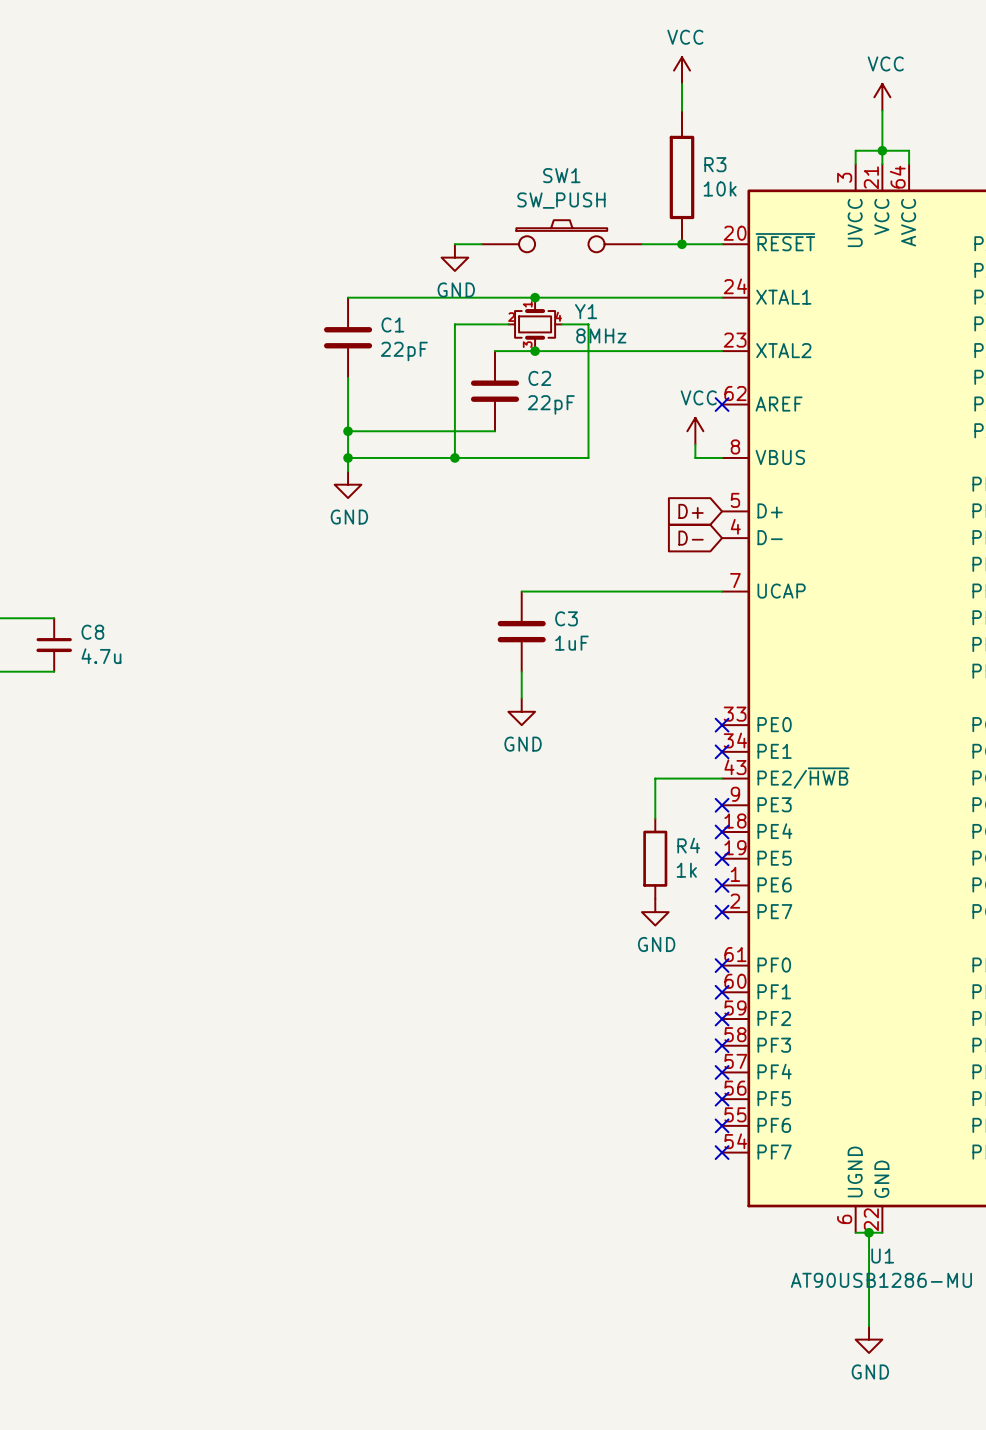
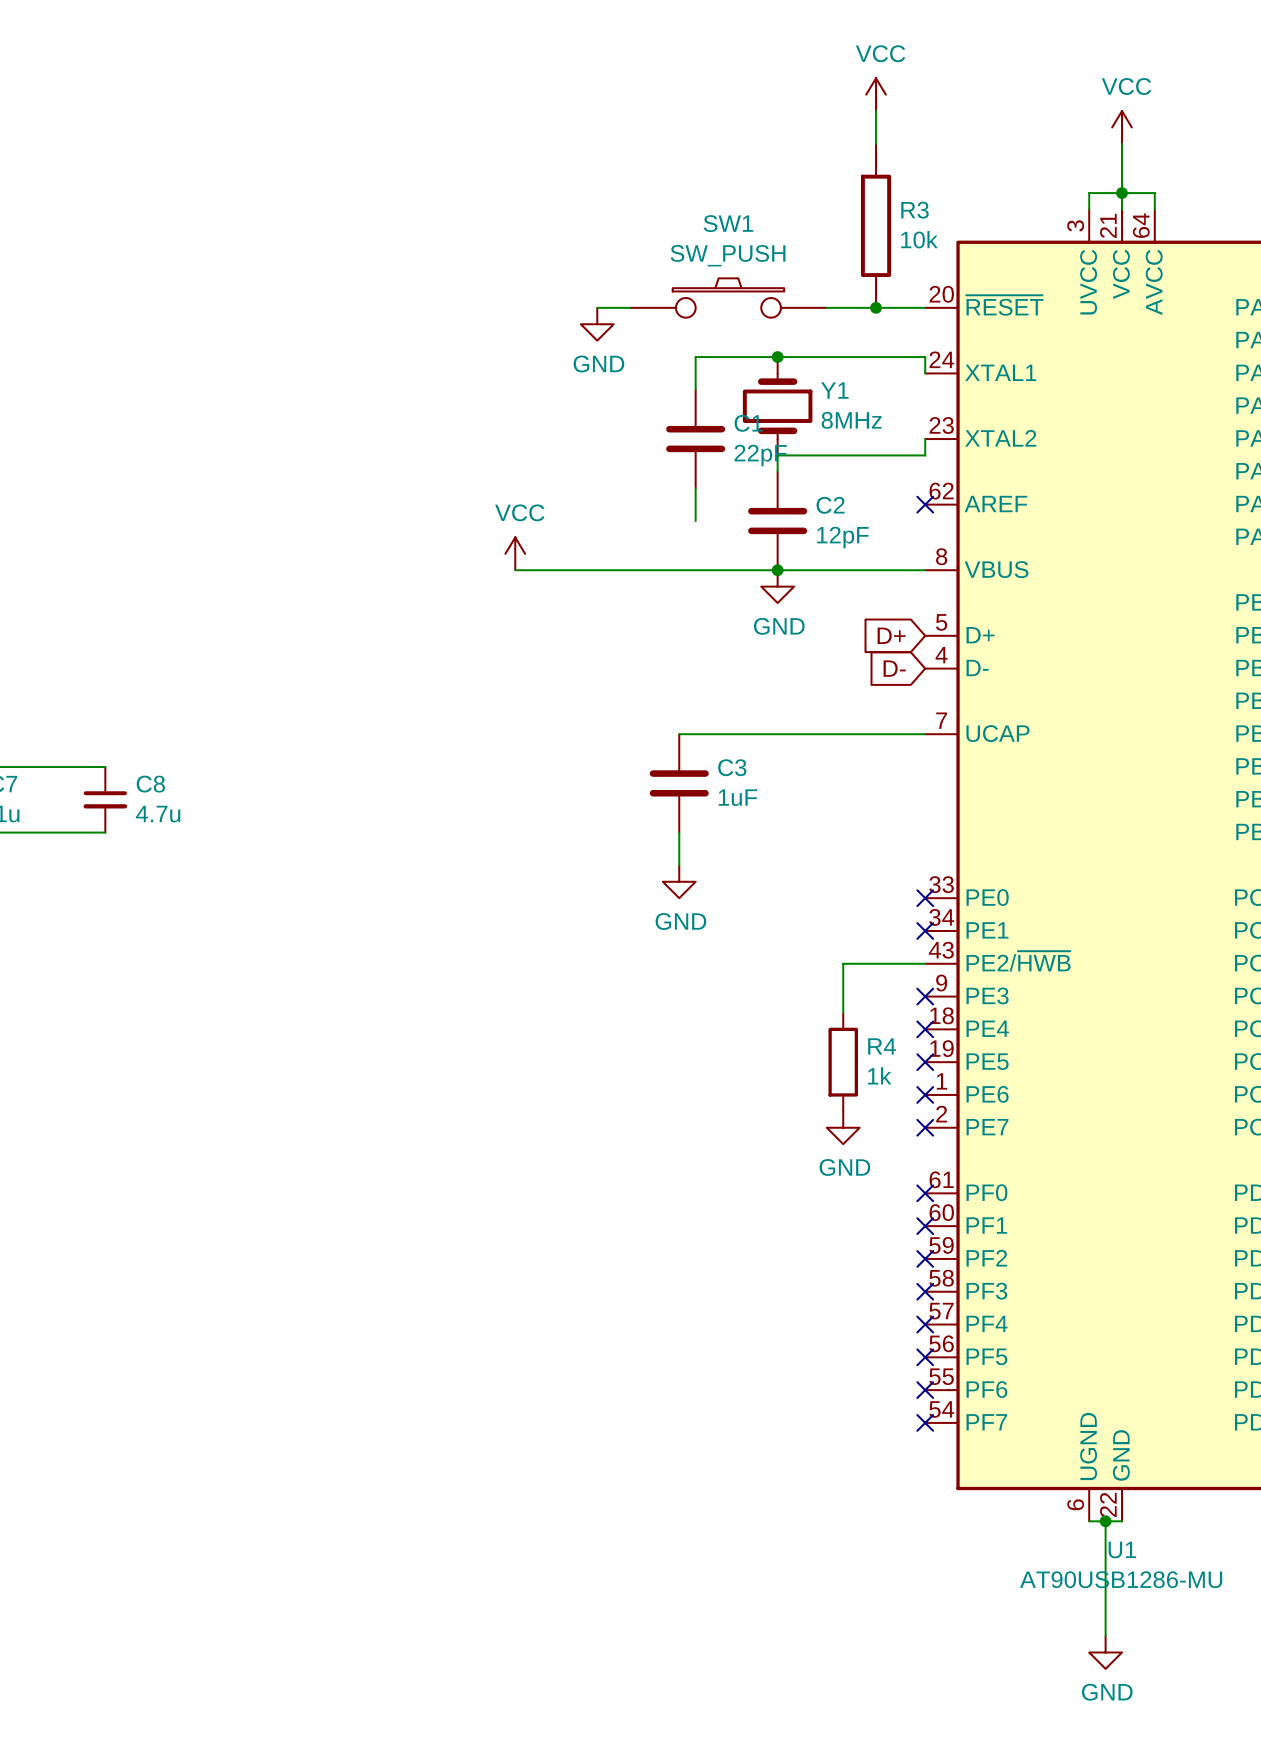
junction: none -> (777, 357)
wire: (348, 297) (722, 297) -> (695, 389) (695, 357) (925, 357) (925, 373)
Y1 symbol: [508, 297, 562, 352] -> [742, 357, 813, 456]
junction: (535, 297) -> none
wire: (508, 324) (454, 324) (454, 457) -> none
wire: (561, 324) (588, 324) (588, 457) -> none
C1 position: (348, 337) -> (695, 439)
wire: (495, 351) (722, 351) -> (777, 471) (777, 455) (925, 455) (925, 439)
junction: (535, 351) -> none
wire: (348, 377) (348, 471) -> none
C2 position: (495, 391) -> (777, 521)
wire: none -> (695, 488) (695, 521)
C2 value: 22pF (551, 404) -> 12pF (842, 537)
wire: (348, 431) (495, 431) -> none
junction: (348, 431) -> none
power symbol: VCC (695, 431) -> none
power symbol: none -> VCC (515, 553)
wire: (695, 444) (695, 457) -> (761, 570) (892, 570)
wire: (348, 457) (388, 457) -> none
junction: (348, 457) -> none
junction: (454, 457) -> none
junction: none -> (777, 570)
power symbol position: GND (348, 484) -> GND (777, 586)

